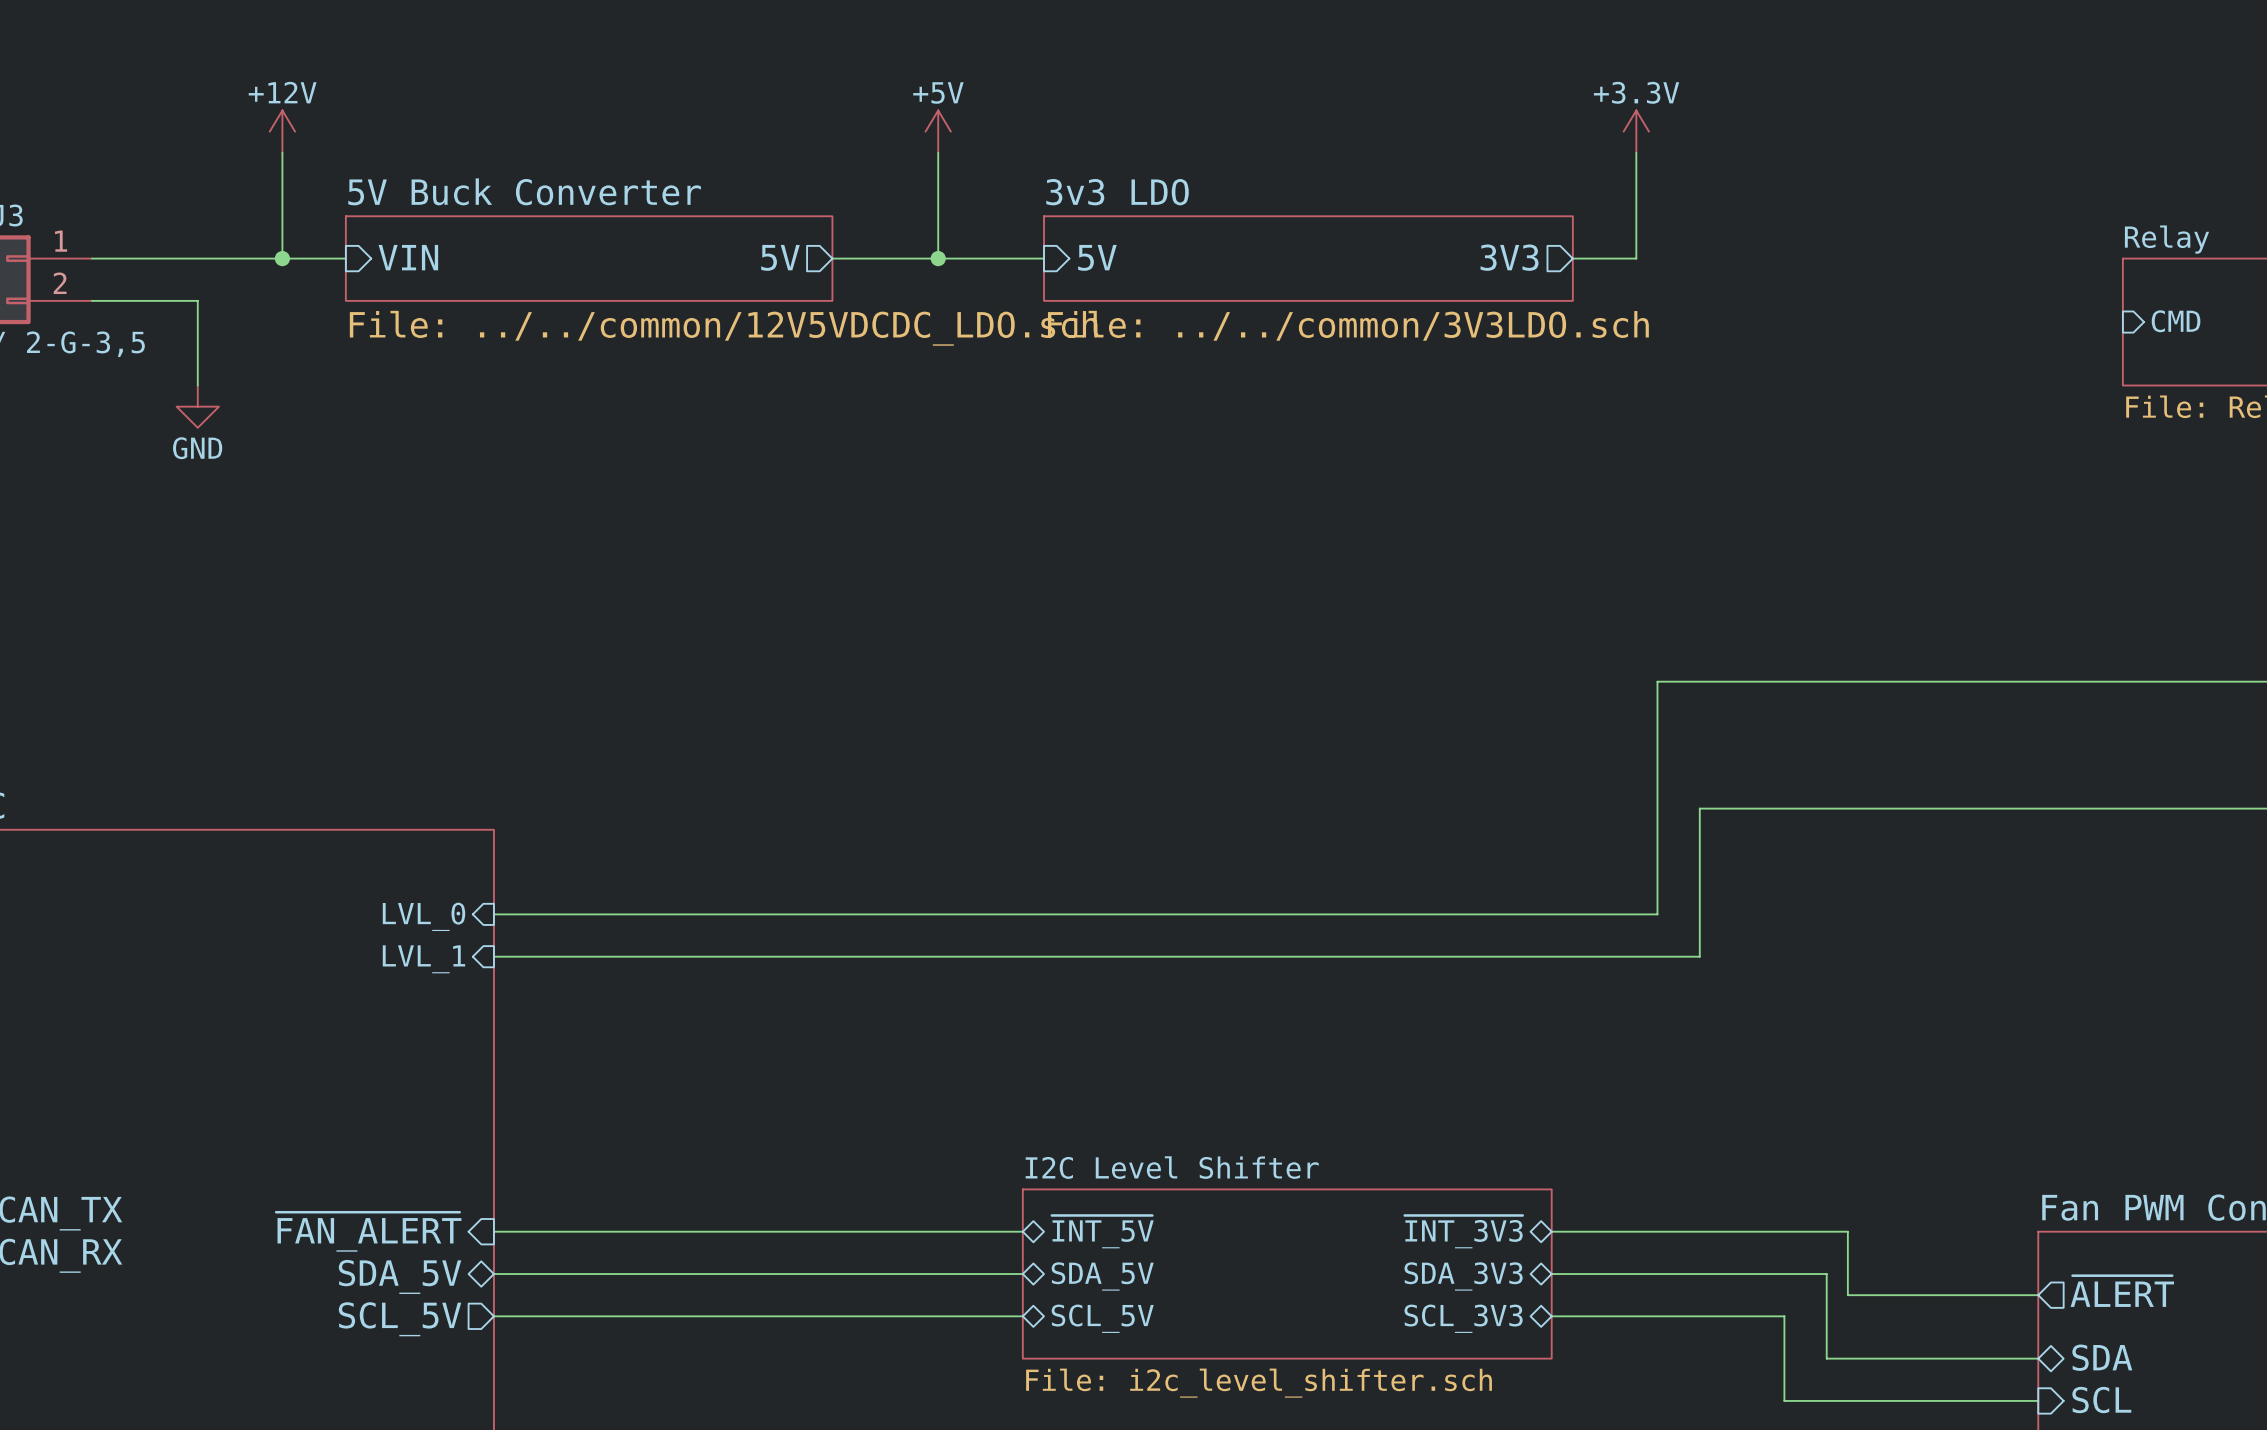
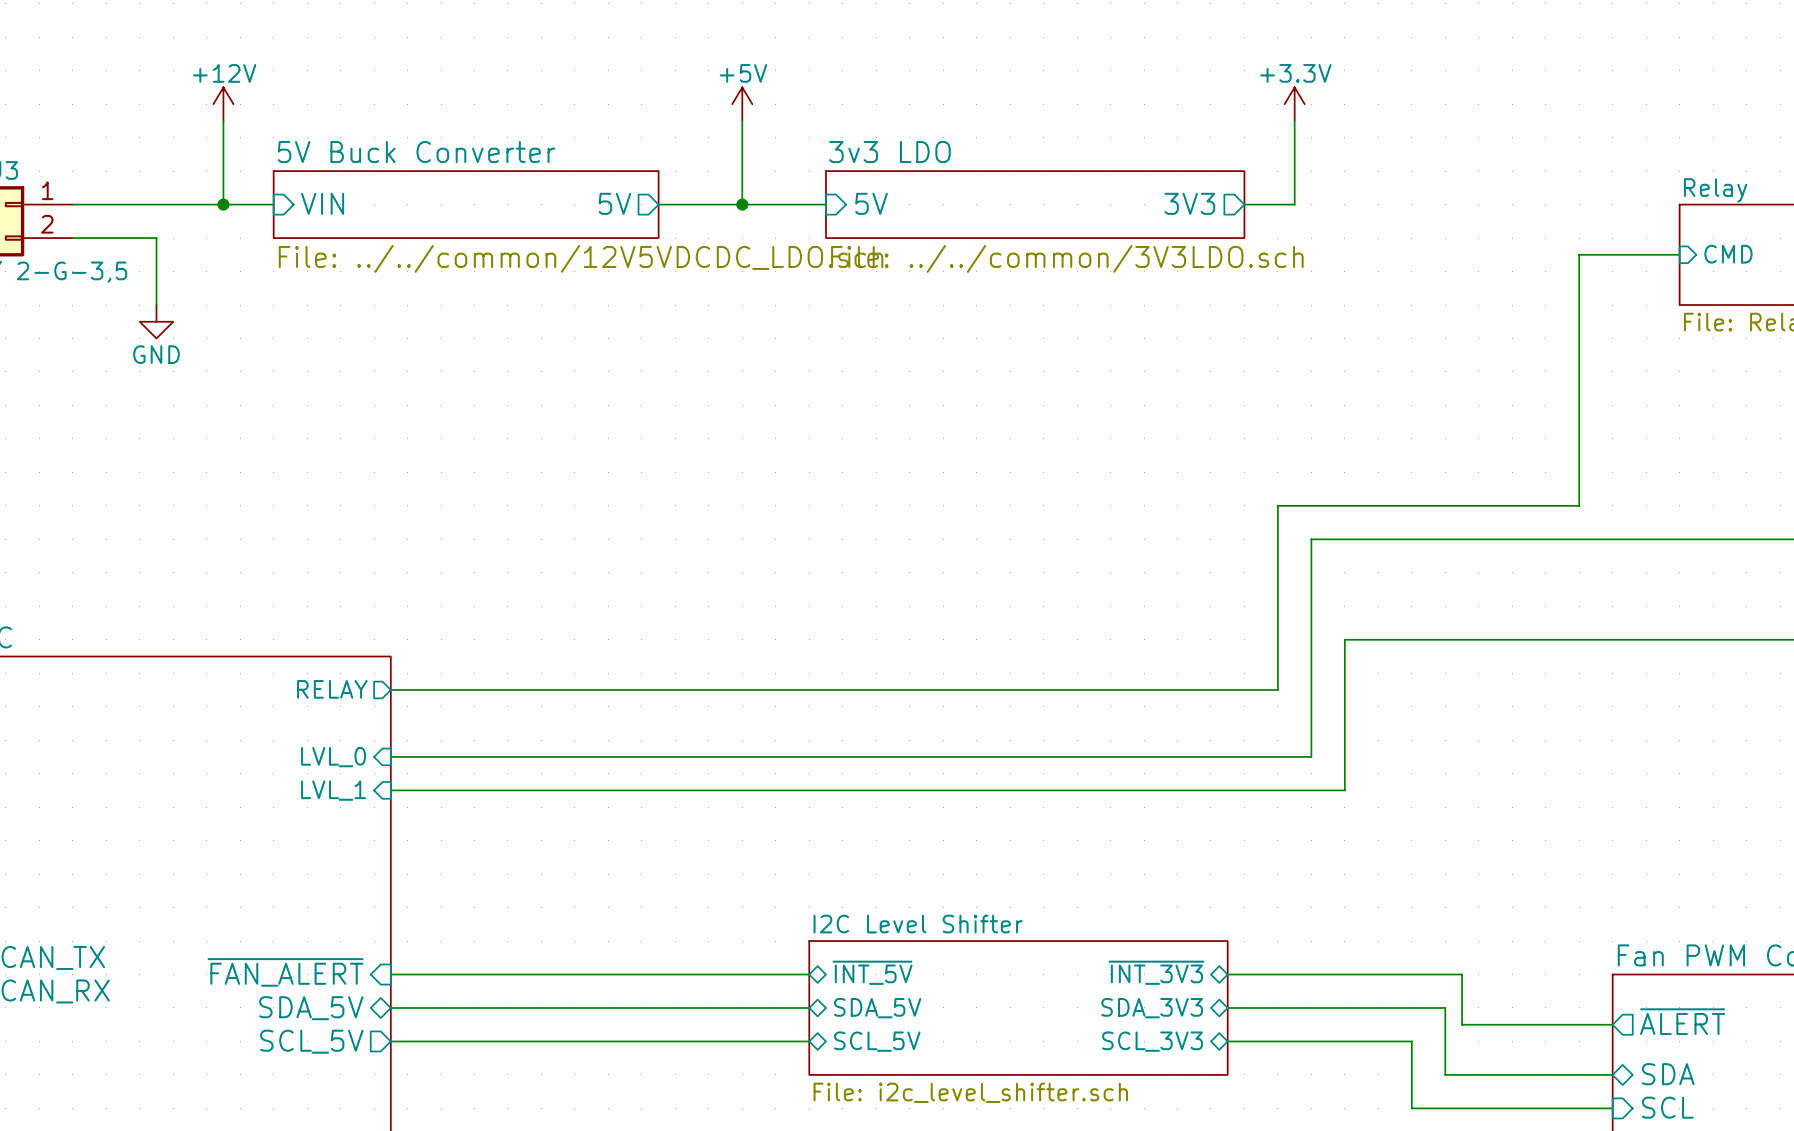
wire: none -> (1679, 254) (1579, 254) (1579, 505) (1277, 505) (1277, 689) (390, 689)
sheet pin: none -> RELAY (332, 689)
wire: (493, 914) (1657, 914) -> none
sheet pin: LVL_0 (424, 916) -> none
wire: (1657, 956) (1699, 956) -> (1311, 756) (1311, 723)
wire: none -> (1344, 756) (1344, 790) (390, 790)
sheet pin: LVL_1 (423, 959) -> LVL_0 (333, 757)
sheet pin: none -> LVL_1 (333, 790)

